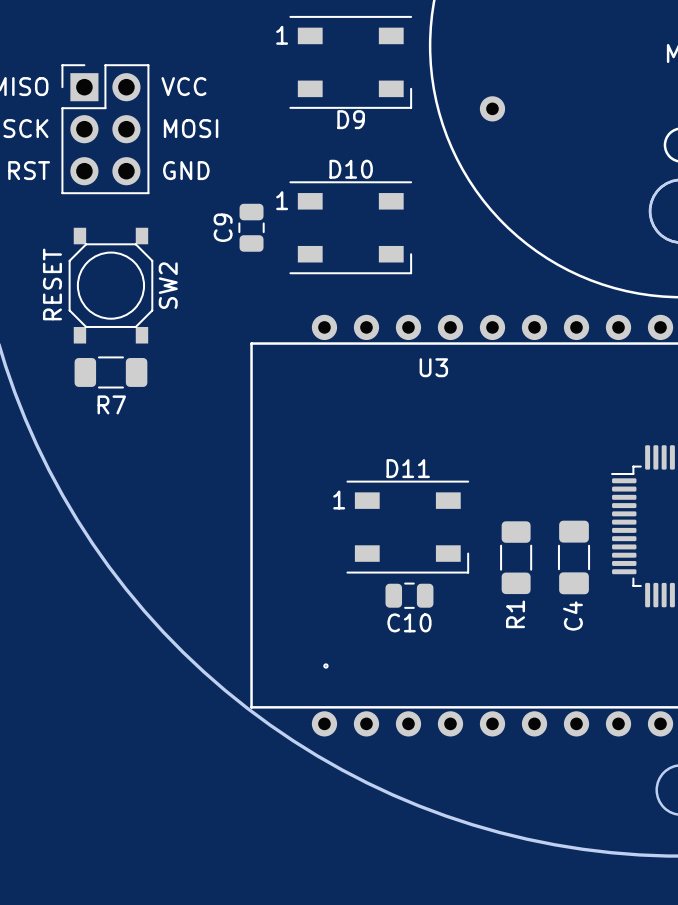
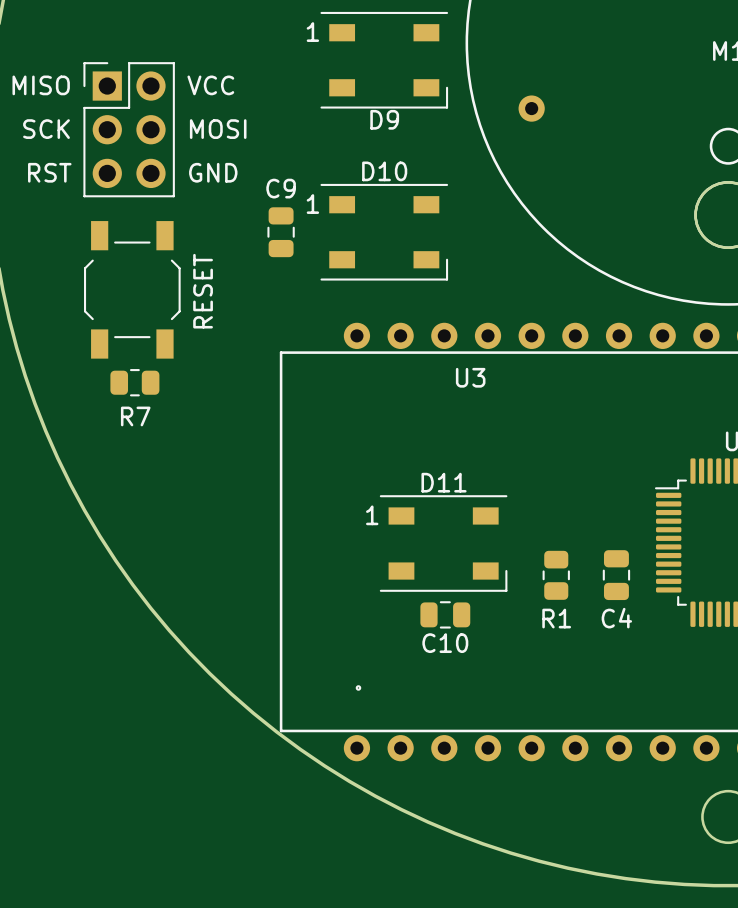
C9 name rotation: 0° (223, 227) -> 90° clockwise (281, 188)
C9 name position: C9 (223, 227) -> C9 (281, 188)
part: none -> (132, 289)
text position: RESET (52, 284) -> RESET (203, 291)
SW2: (110, 285) -> none
R7 footprint: [74, 356, 148, 389] -> [110, 369, 160, 397]
C4 footprint: [557, 520, 591, 595] -> [602, 550, 631, 601]
R1 footprint: [500, 521, 533, 595] -> [542, 550, 570, 600]
R1 name rotation: 0° (515, 614) -> 90° clockwise (556, 618)
C4 name rotation: 0° (573, 615) -> 90° clockwise (616, 618)

